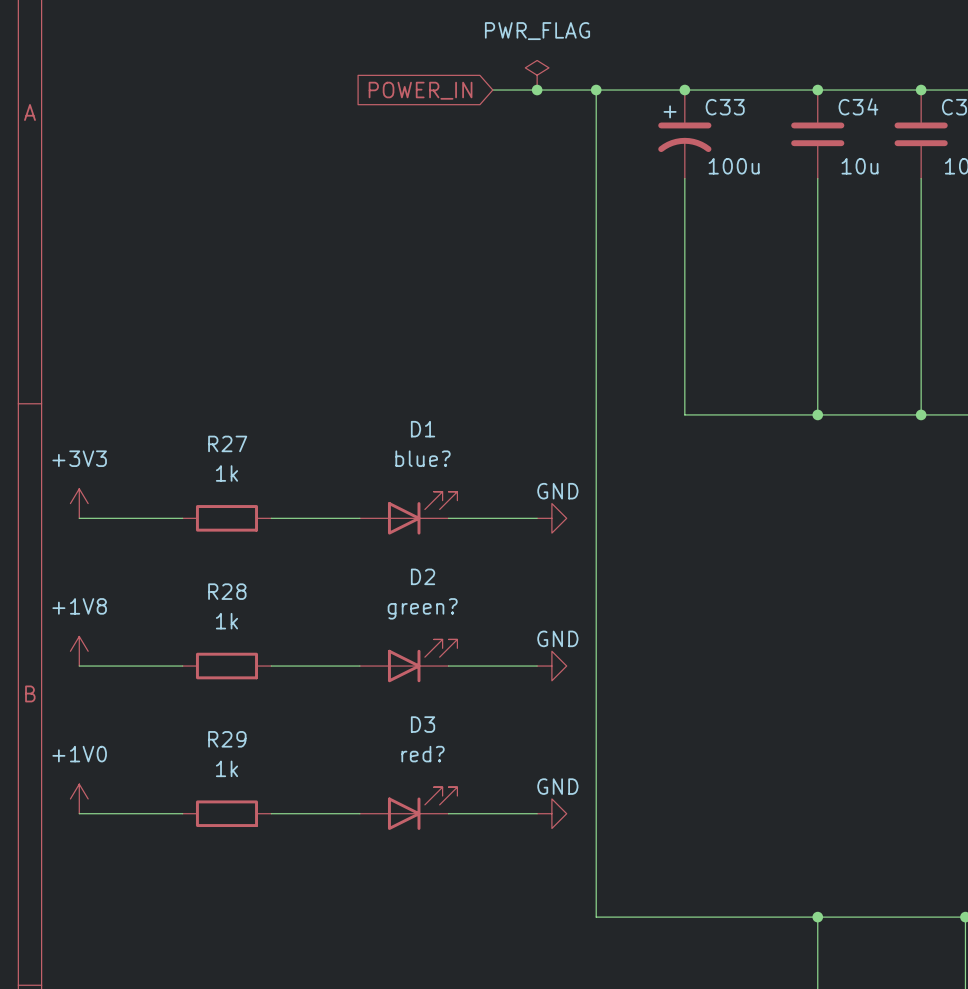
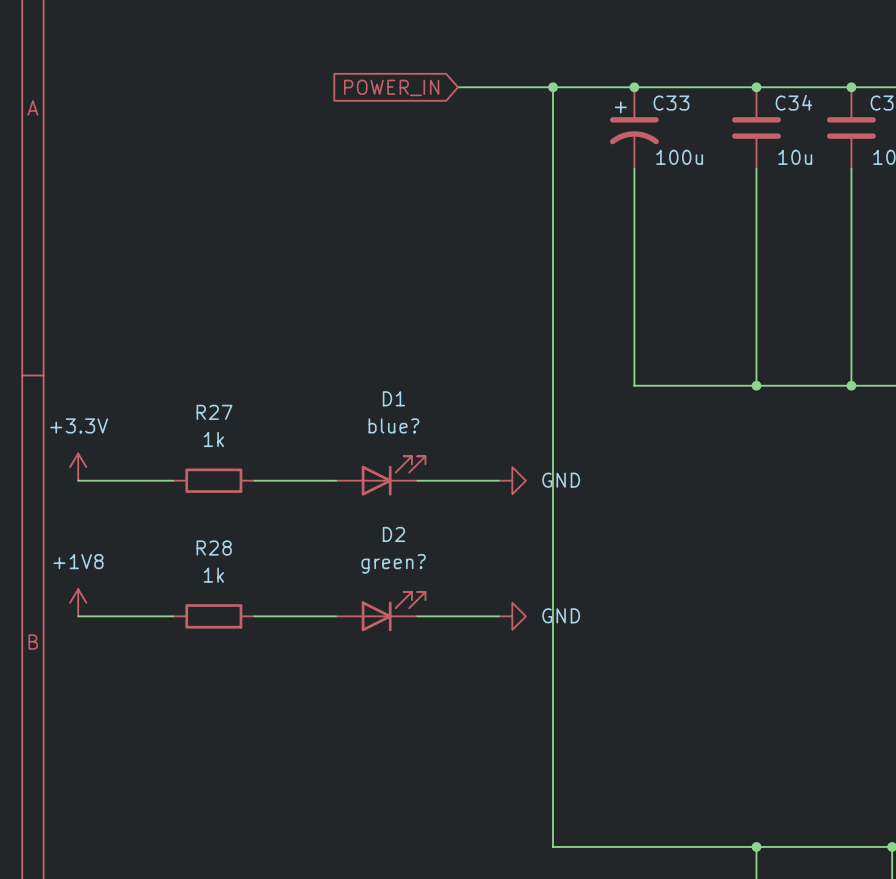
power symbol: PWR_FLAG (537, 75) -> none
junction: (537, 90) -> none
power symbol text position: GND (557, 491) -> GND (561, 480)
power symbol: +3V3 (79, 503) -> +3.3V (78, 467)
power symbol text position: GND (557, 638) -> GND (561, 615)
power symbol: +1V0 (79, 798) -> none
D3: red? (408, 808) -> none
wire: (79, 813) (182, 813) -> none
R29: 1k (226, 813) -> none
wire: (271, 813) (359, 813) -> none
wire: (448, 813) (537, 813) -> none
power symbol: GND (551, 813) -> none

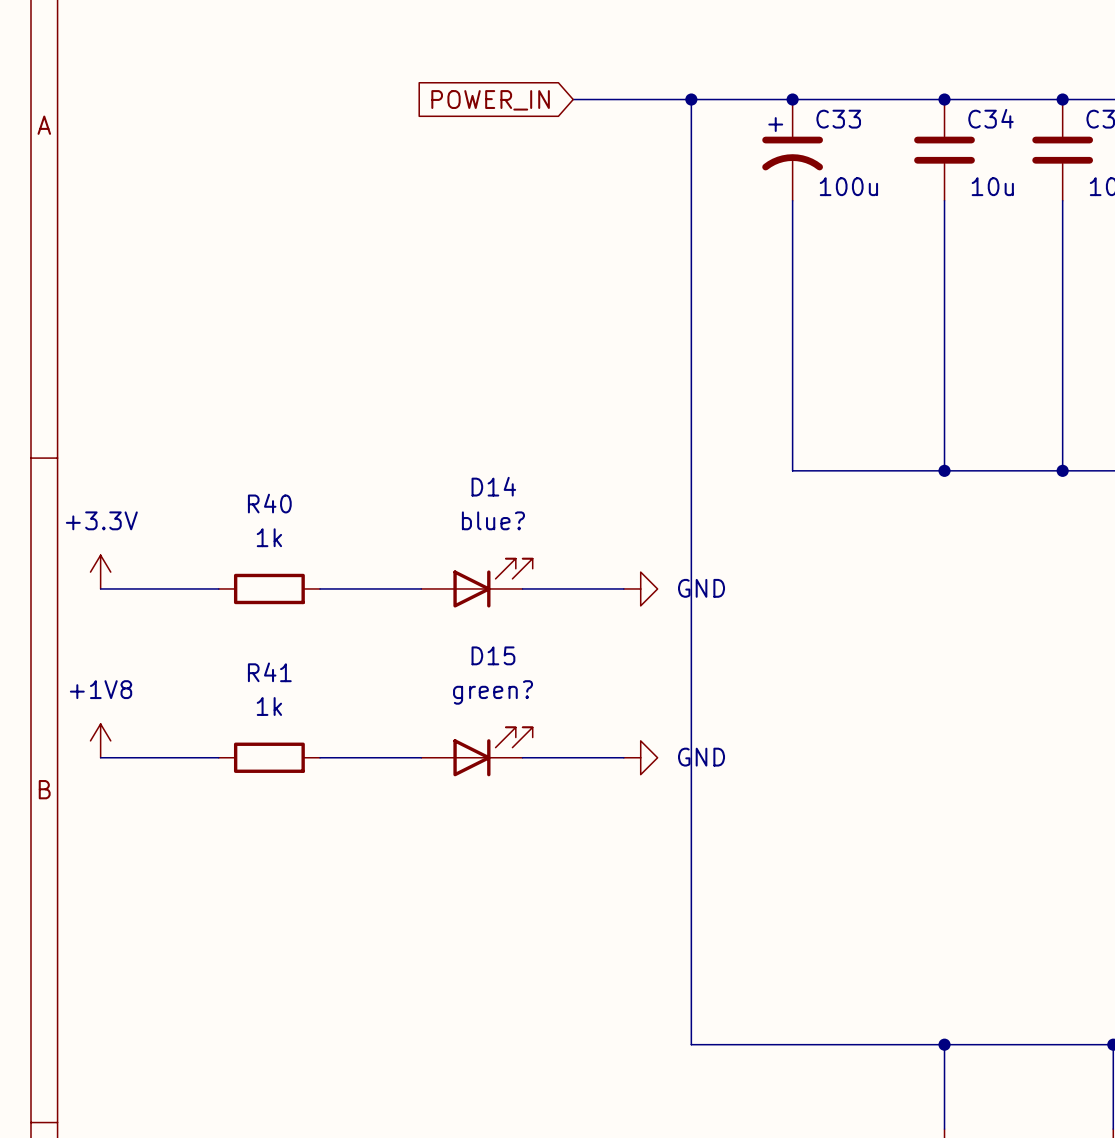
D1 name: D1 (393, 398) -> D14 (493, 486)
R27 name: R27 (214, 412) -> R40 (269, 503)
D2 name: D2 (393, 534) -> D15 (493, 655)
R28 name: R28 (214, 548) -> R41 (269, 672)

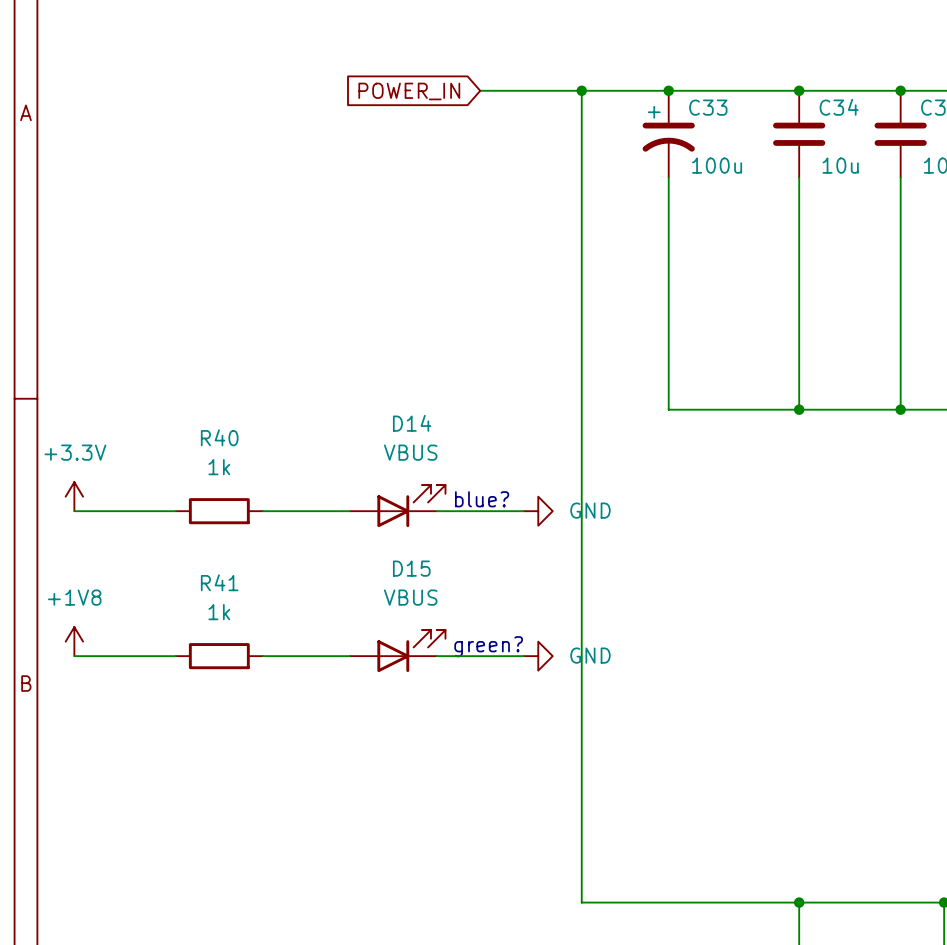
D14 value: blue? (493, 520) -> VBUS (410, 452)
text: none -> blue? (482, 499)
D15 value: green? (493, 692) -> VBUS (410, 597)
text: none -> green? (488, 646)

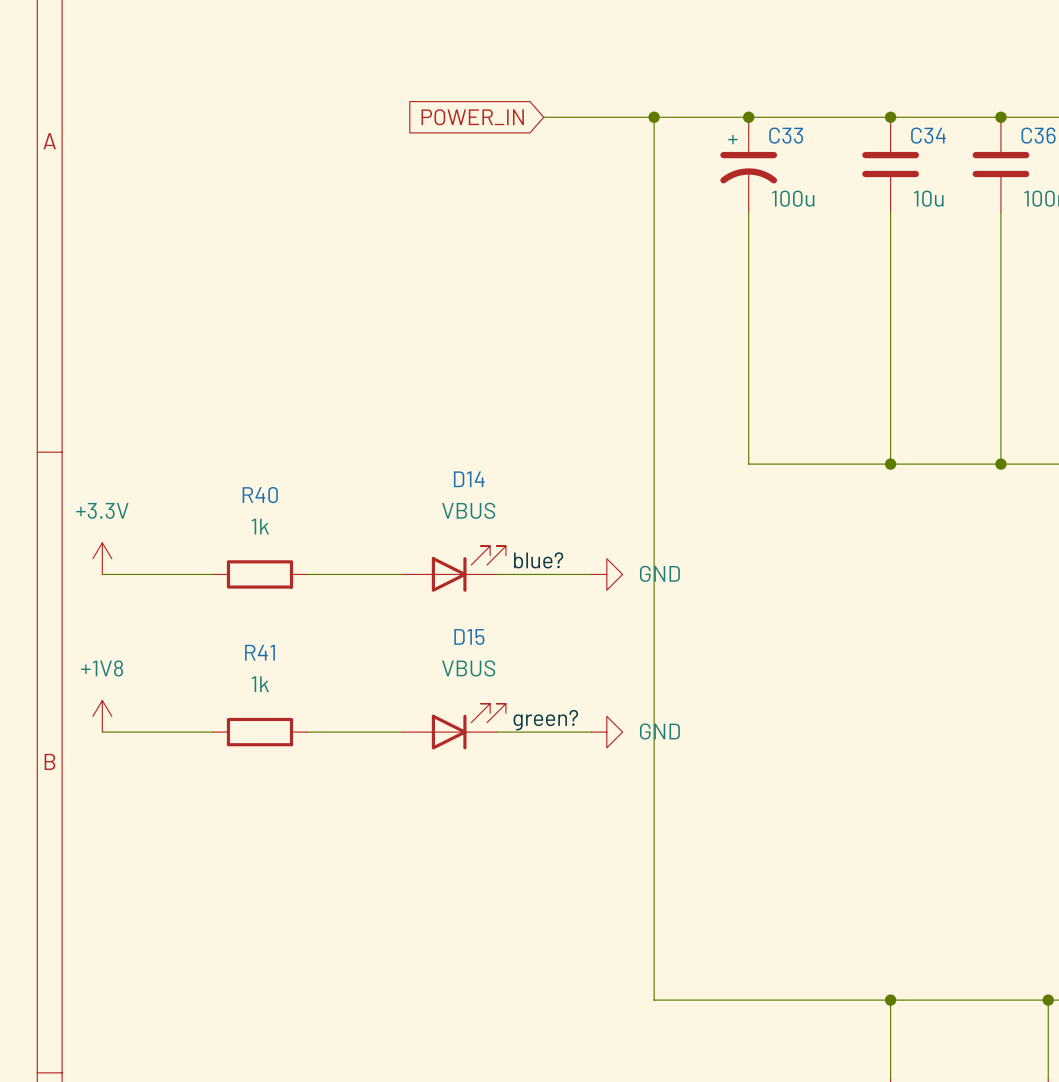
label: none -> blue? (538, 560)
text: blue? (482, 499) -> none
label: none -> green? (545, 720)
text: green? (488, 646) -> none

